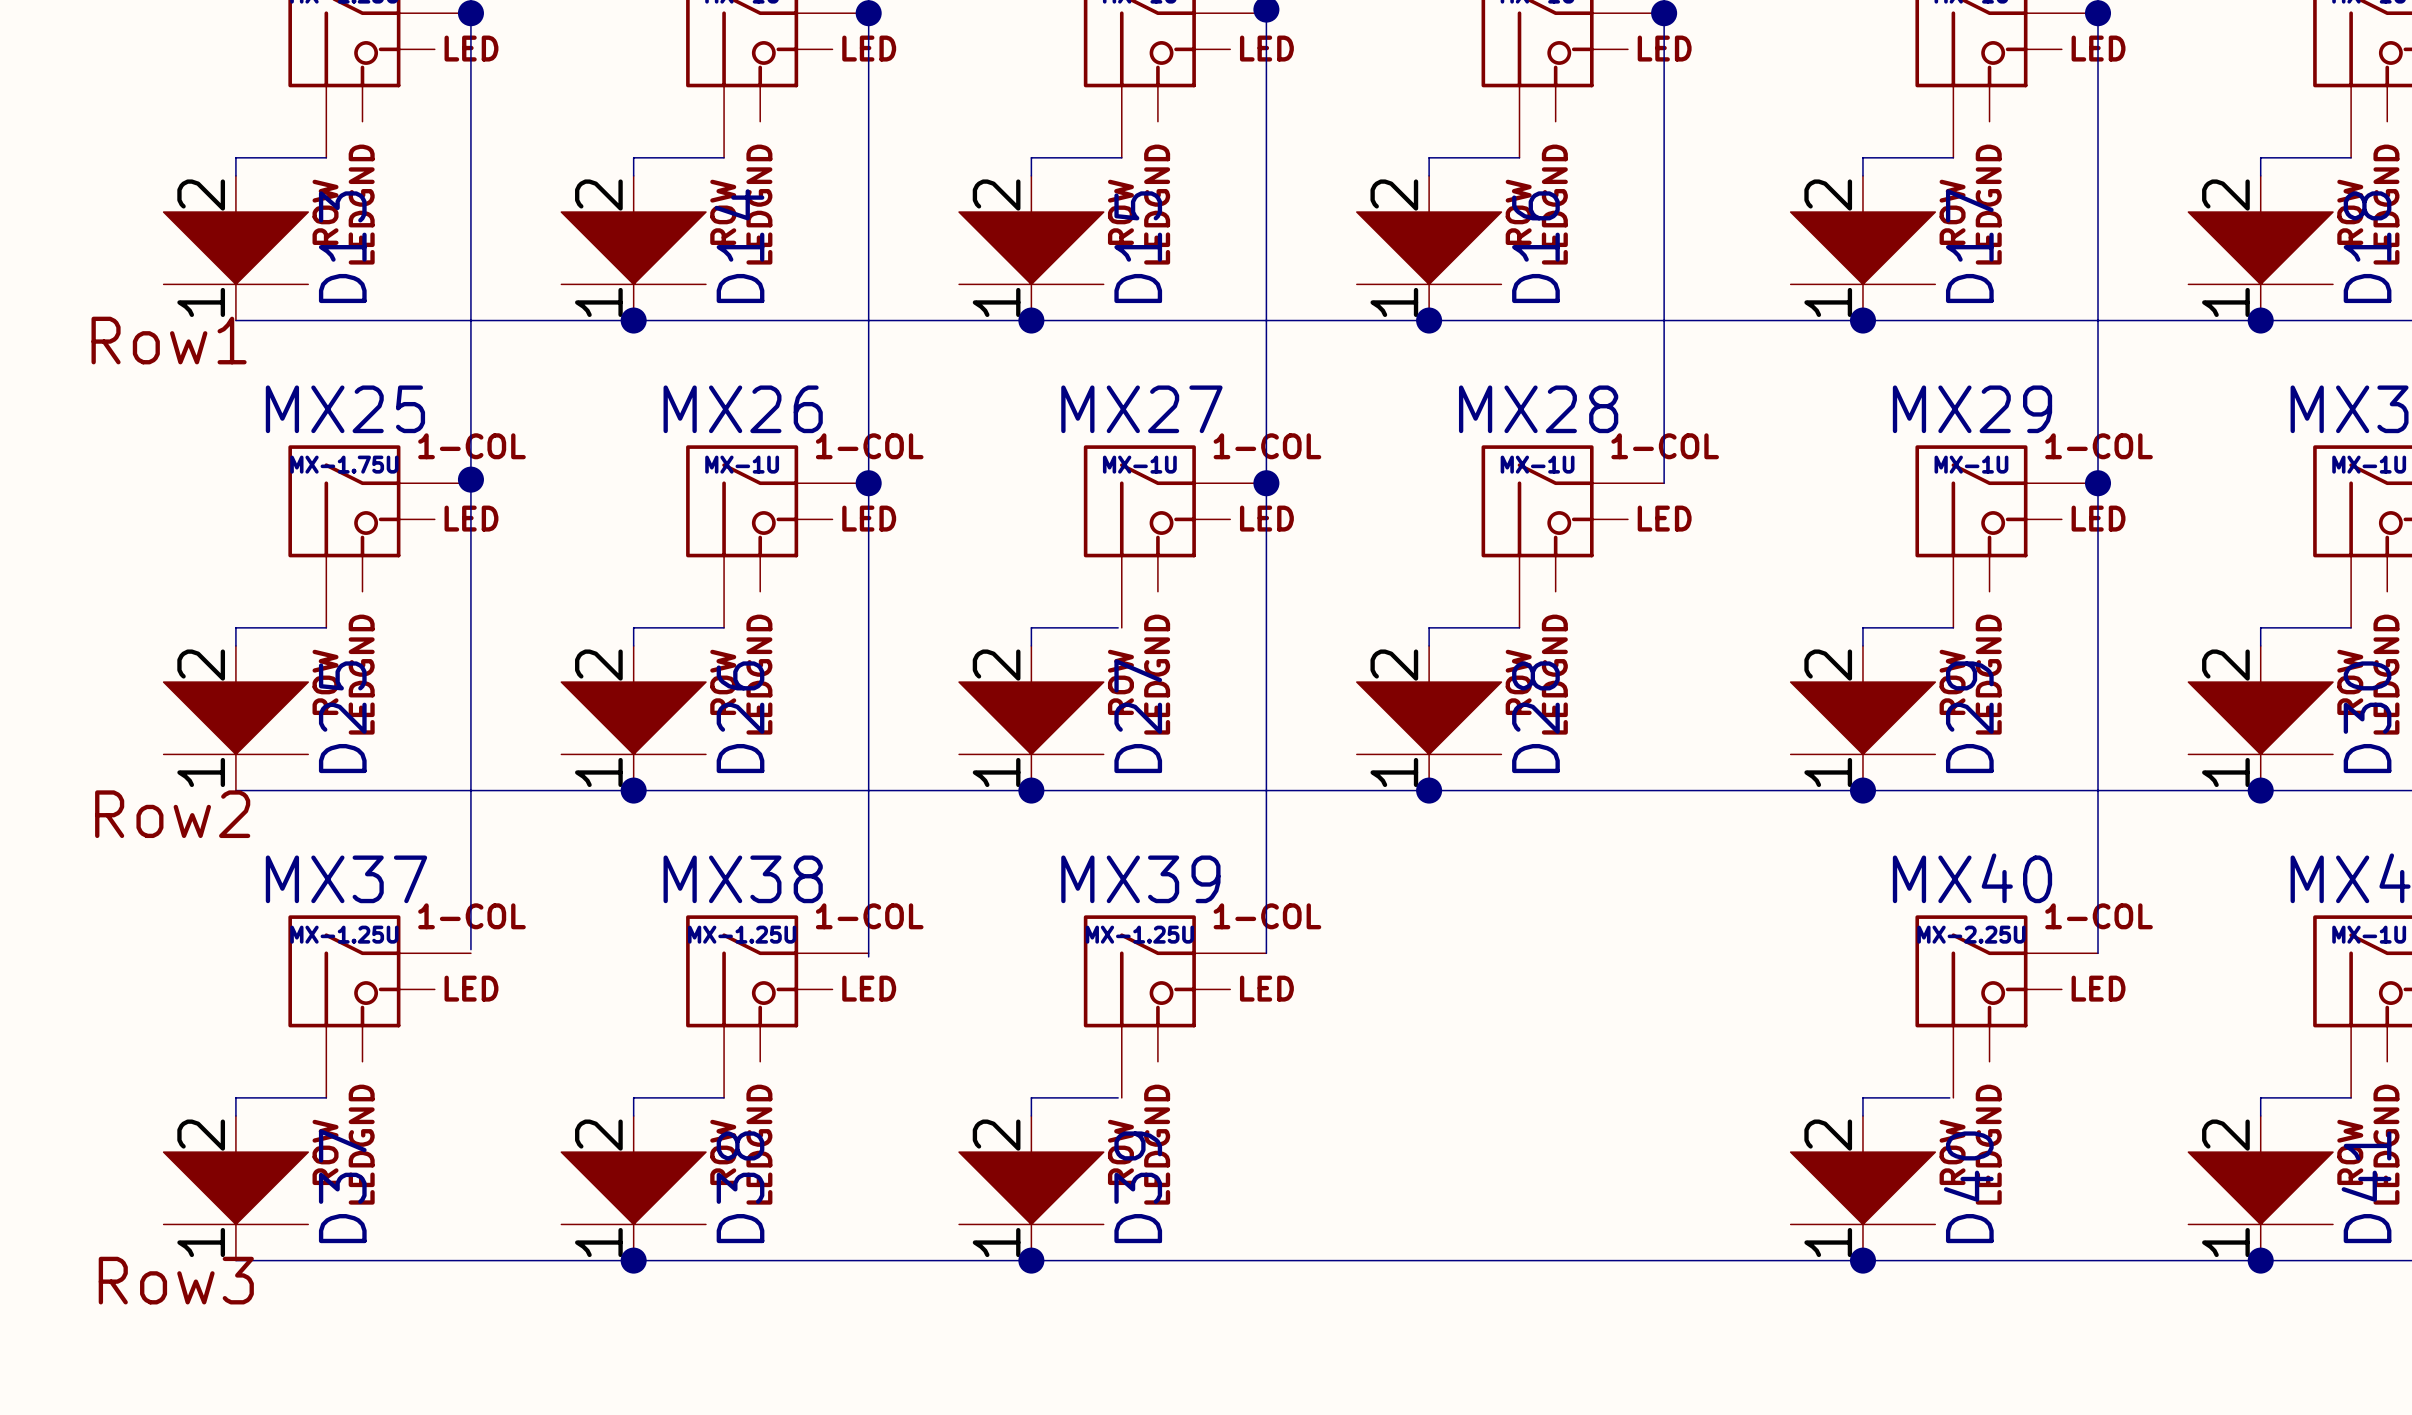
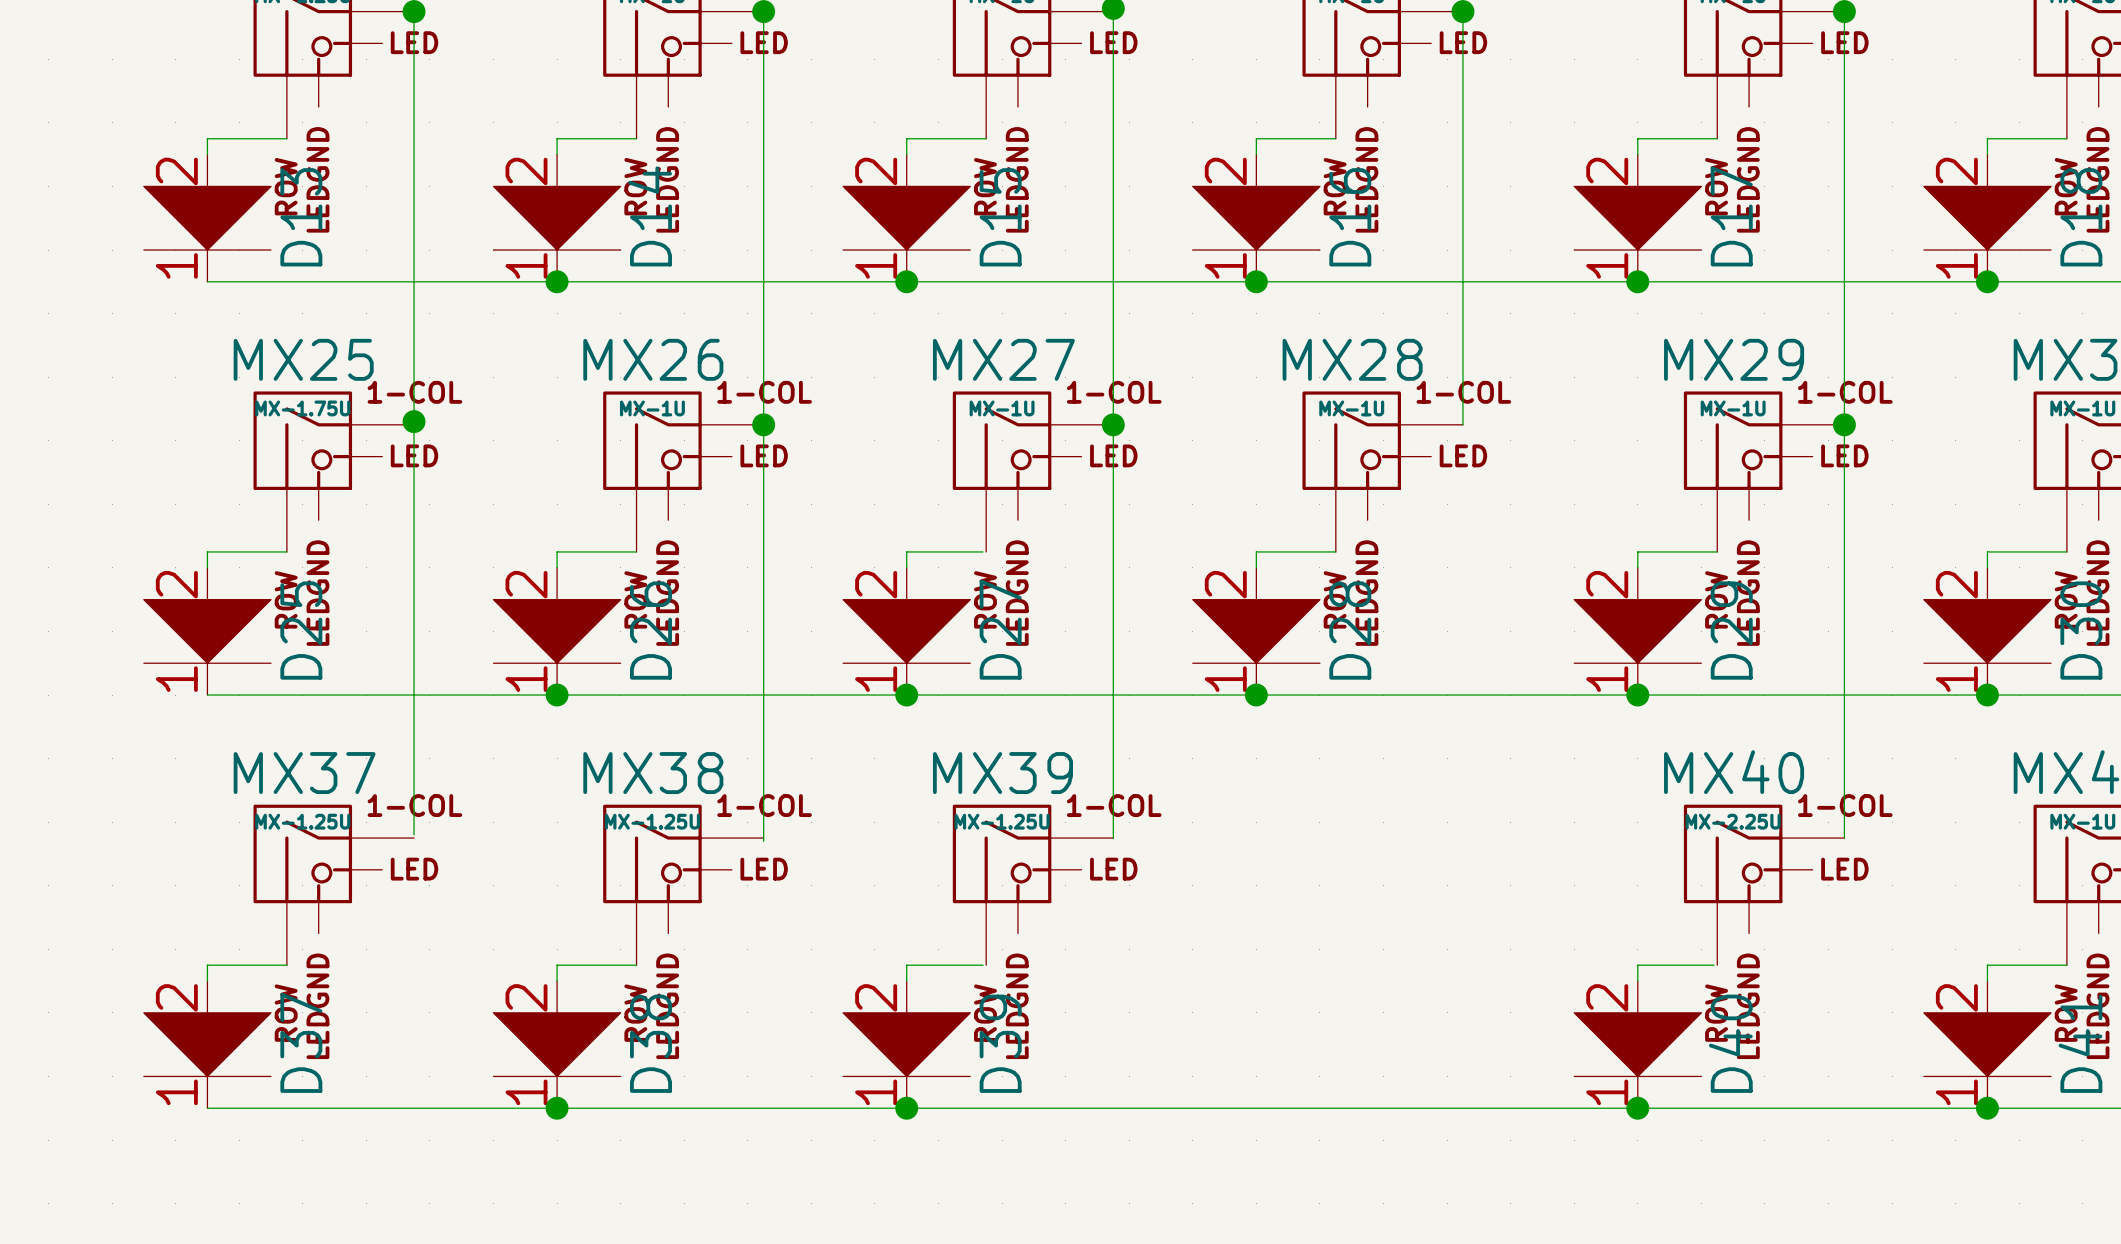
label: Row1 (169, 340) -> none
label: Row2 (172, 814) -> none
label: Row3 (176, 1280) -> none

